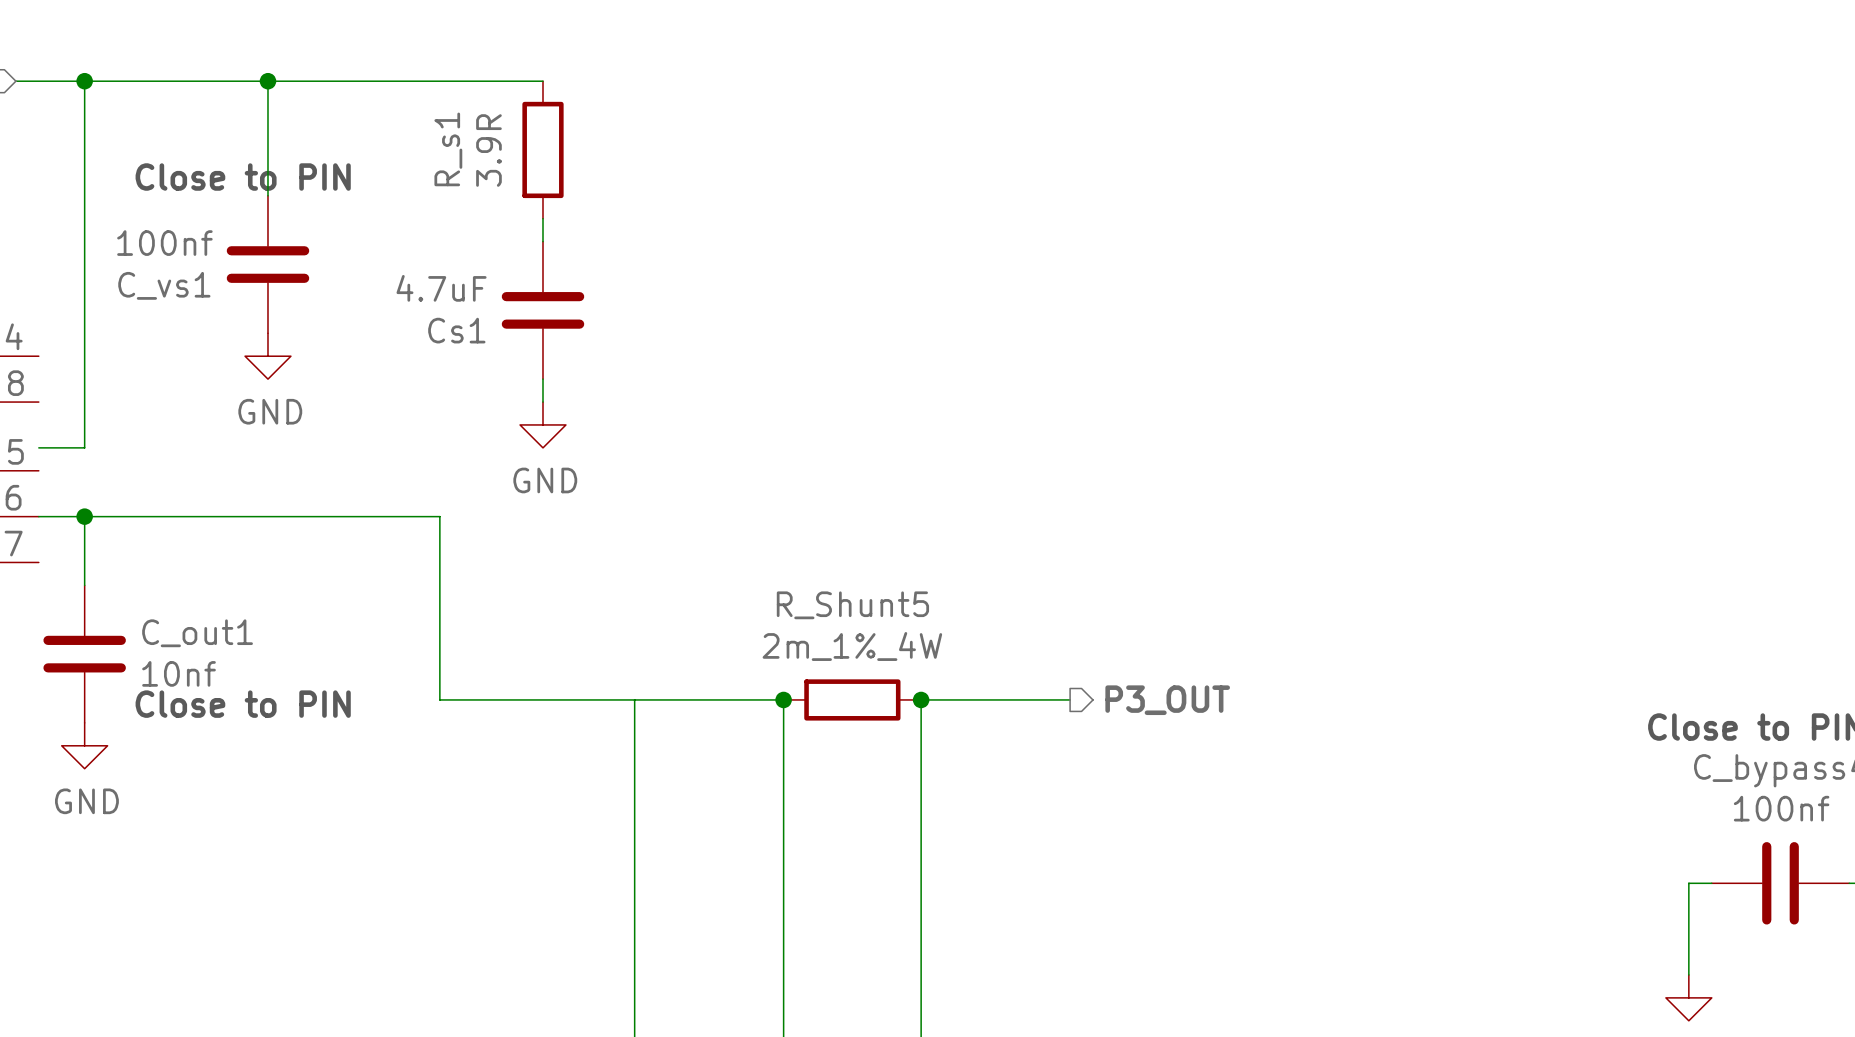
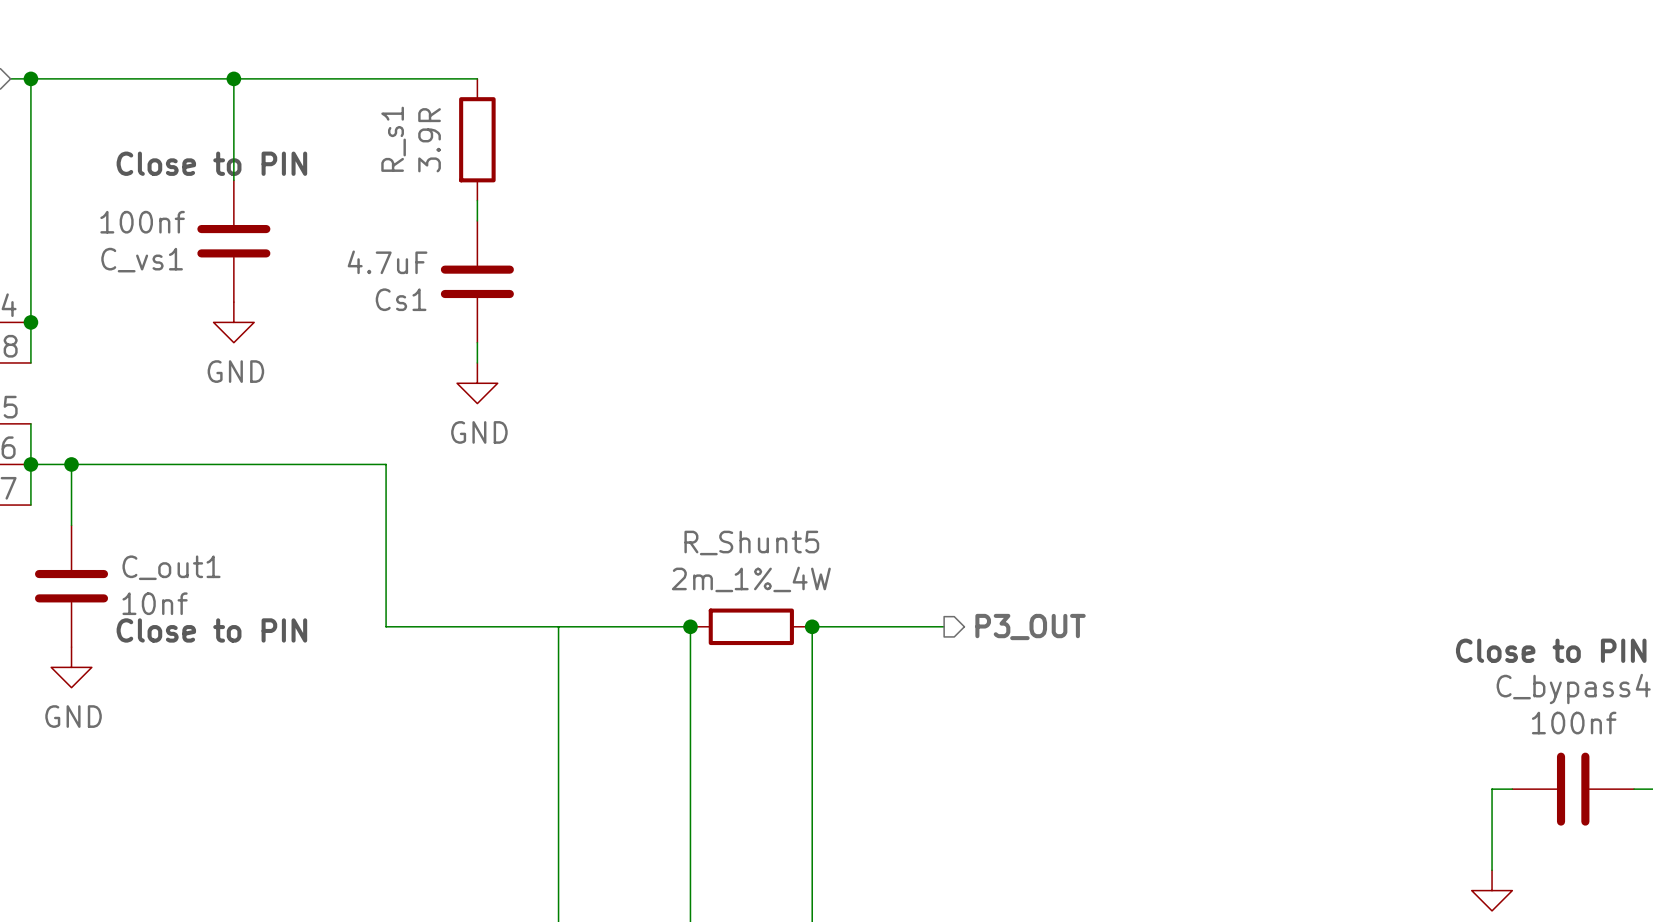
wire: none -> (30, 78) (30, 362)
wire: (84, 81) (84, 447) (38, 447) -> none
junction position: (84, 81) -> (30, 78)
junction: none -> (30, 322)
wire: none -> (30, 423) (30, 505)
junction: none -> (30, 464)

